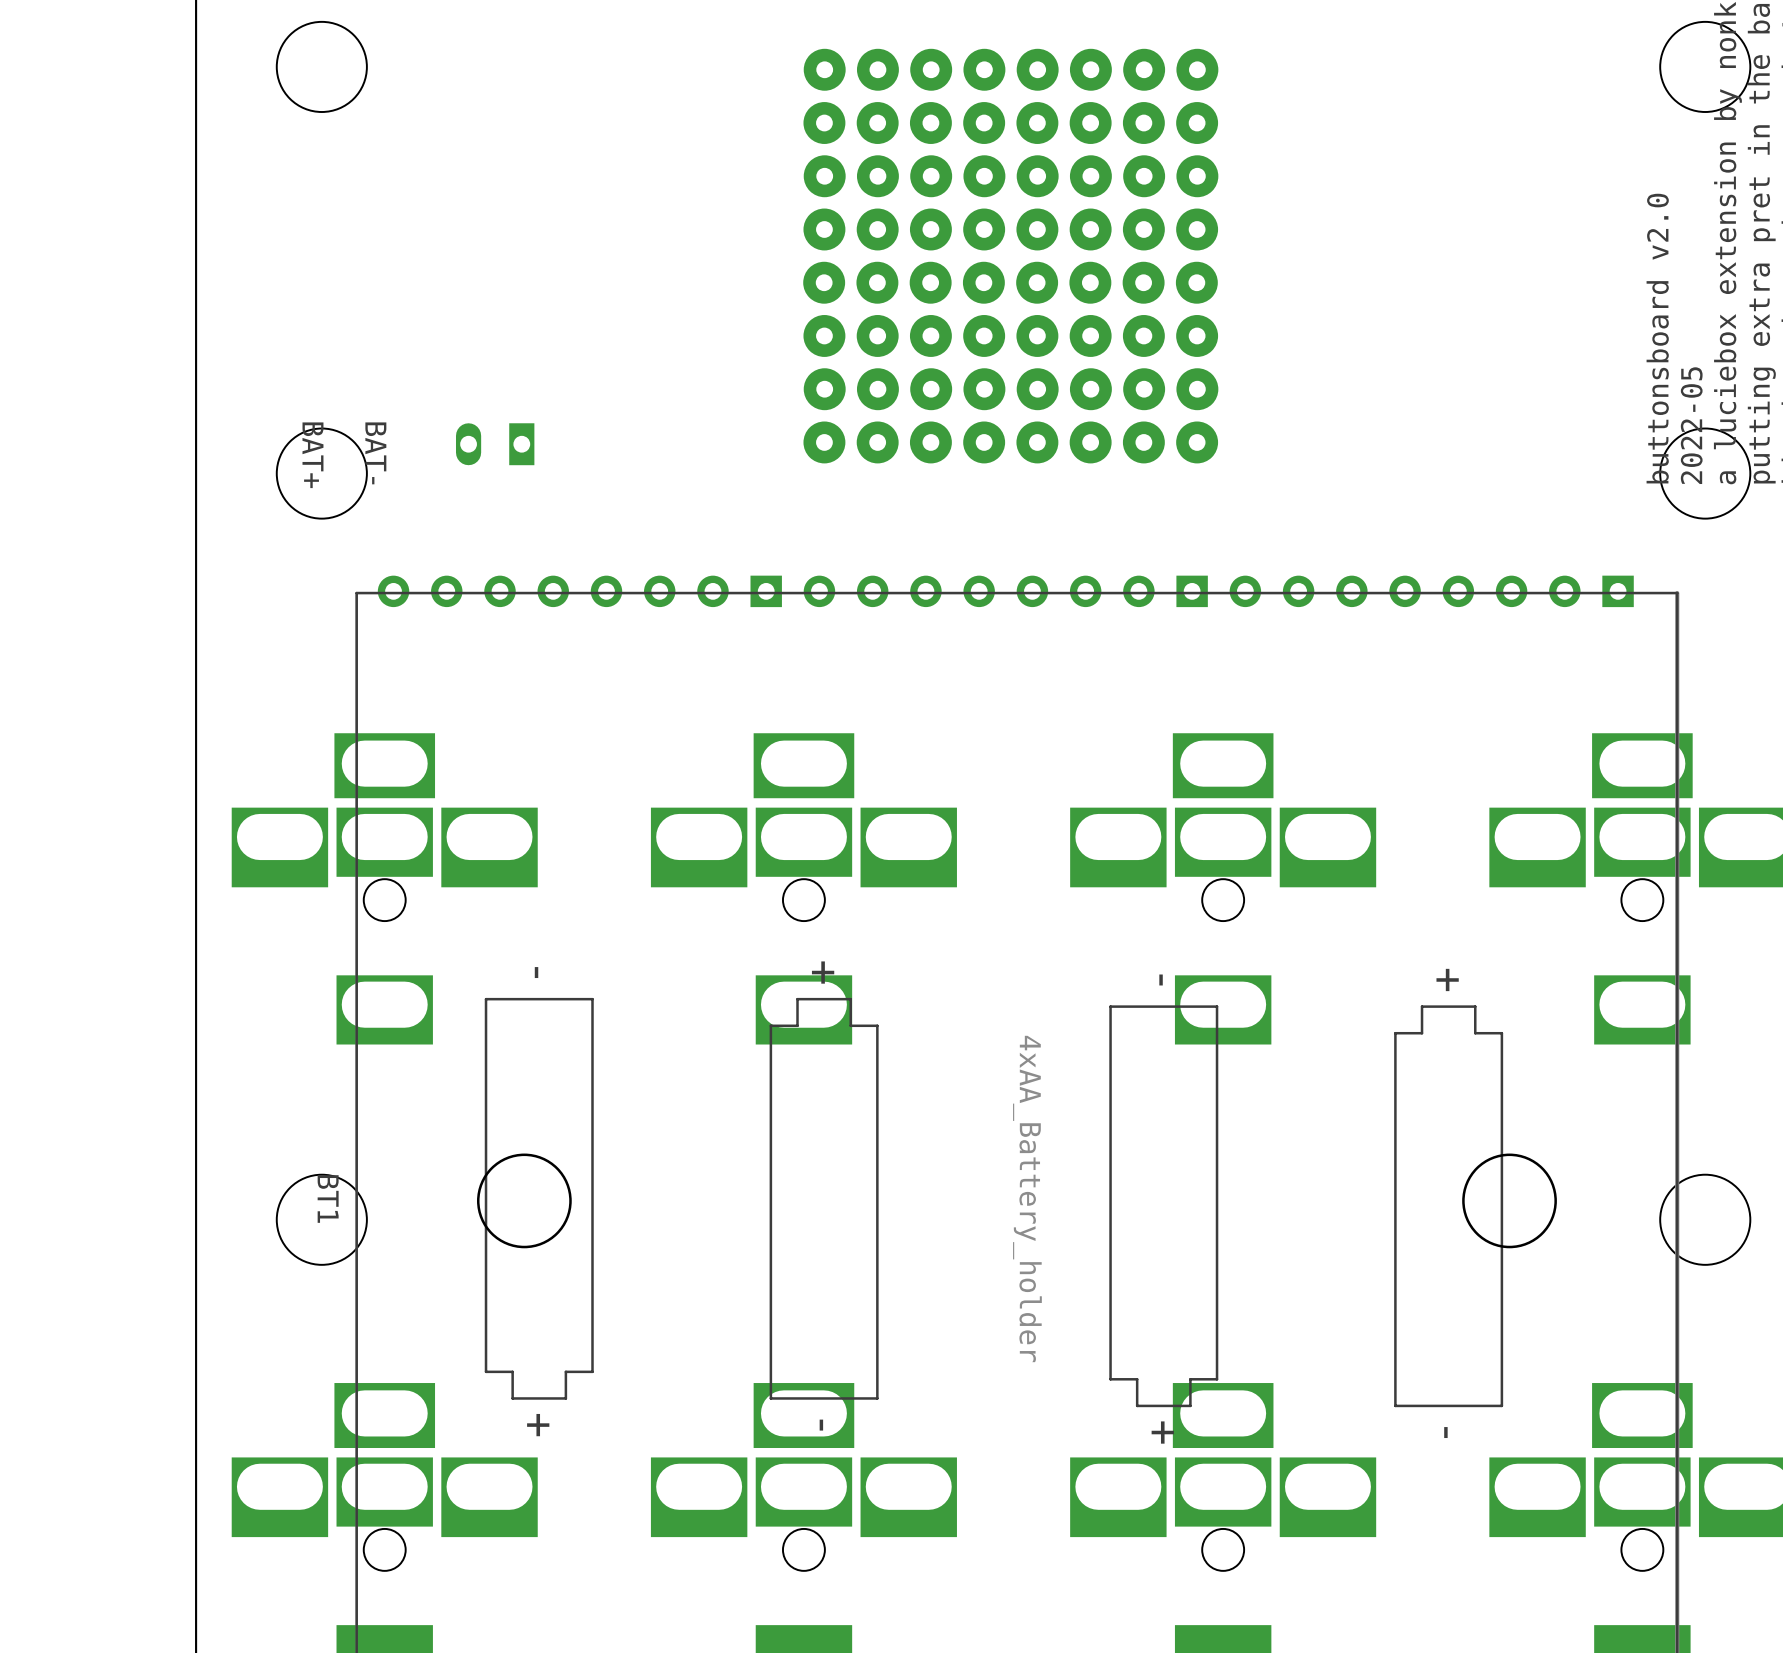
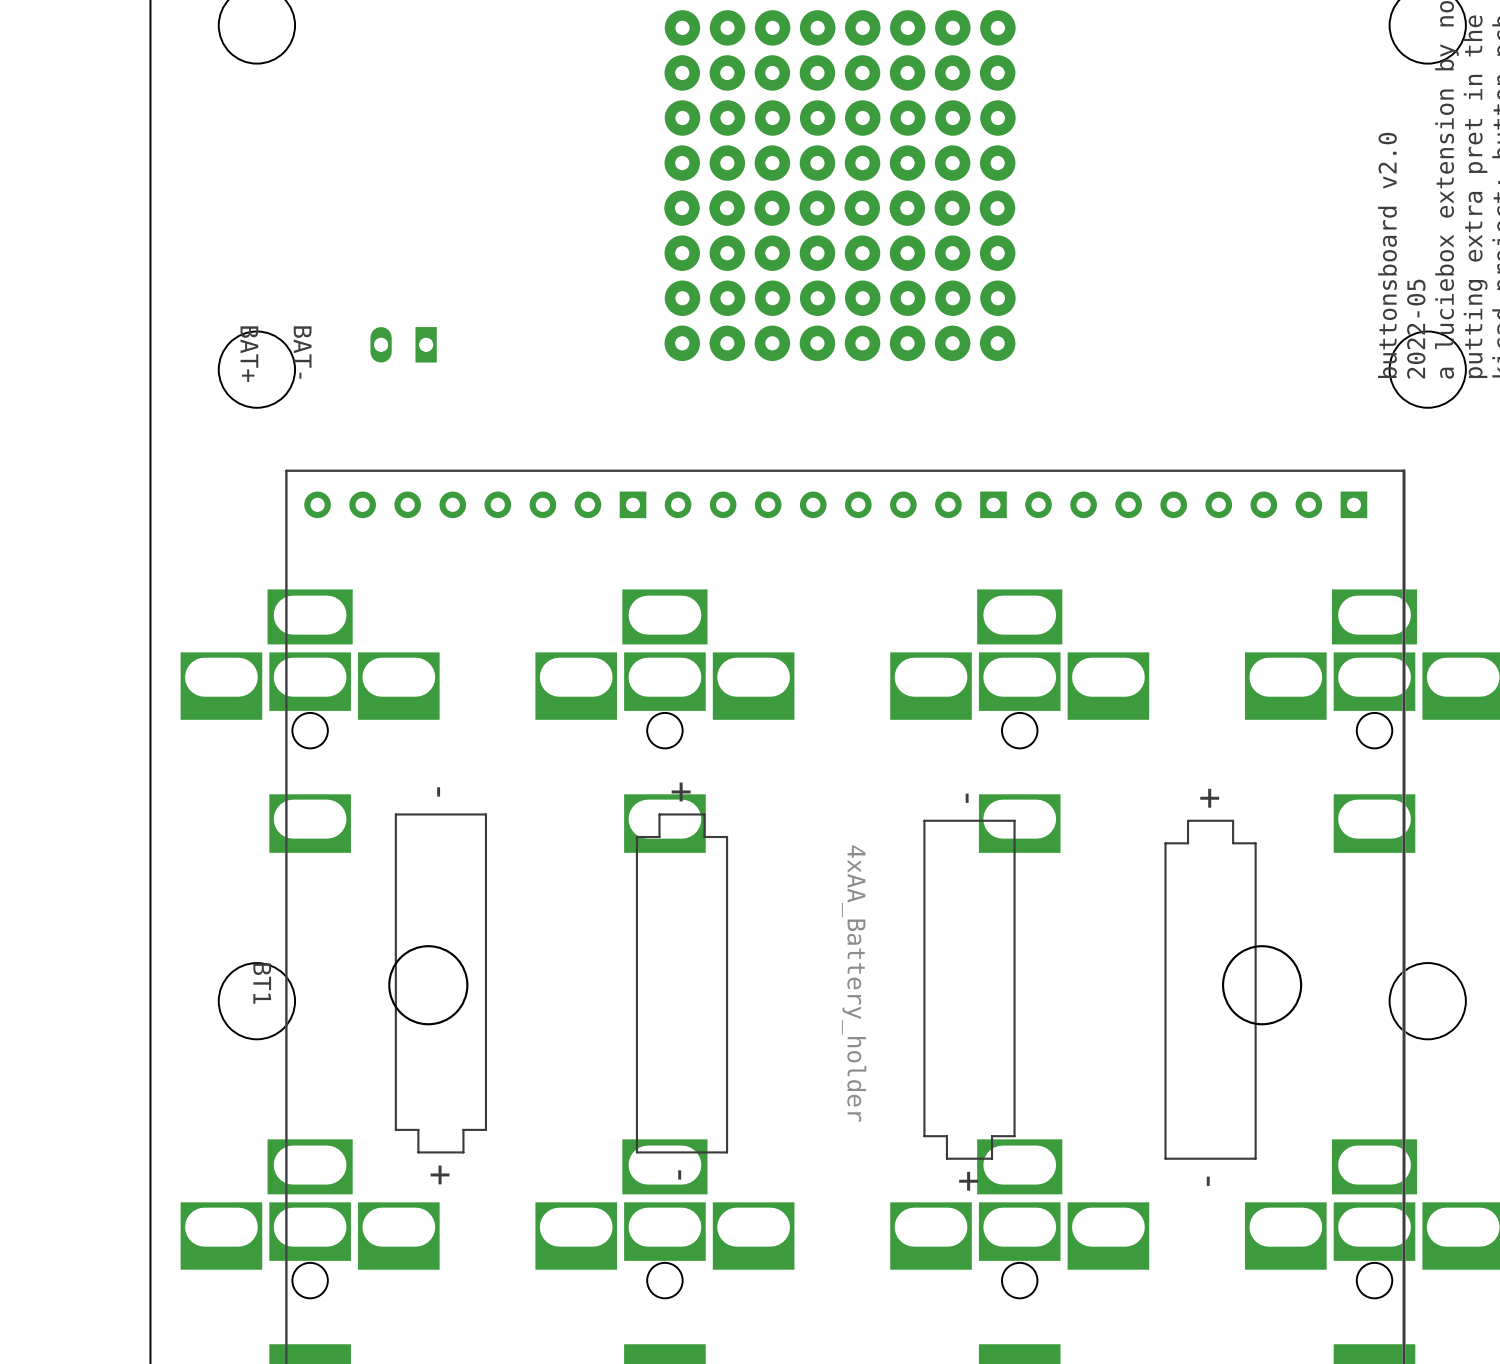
part position: (579, 591) -> (475, 504)
part position: (1005, 591) -> (835, 504)
part position: (1431, 591) -> (1196, 504)

